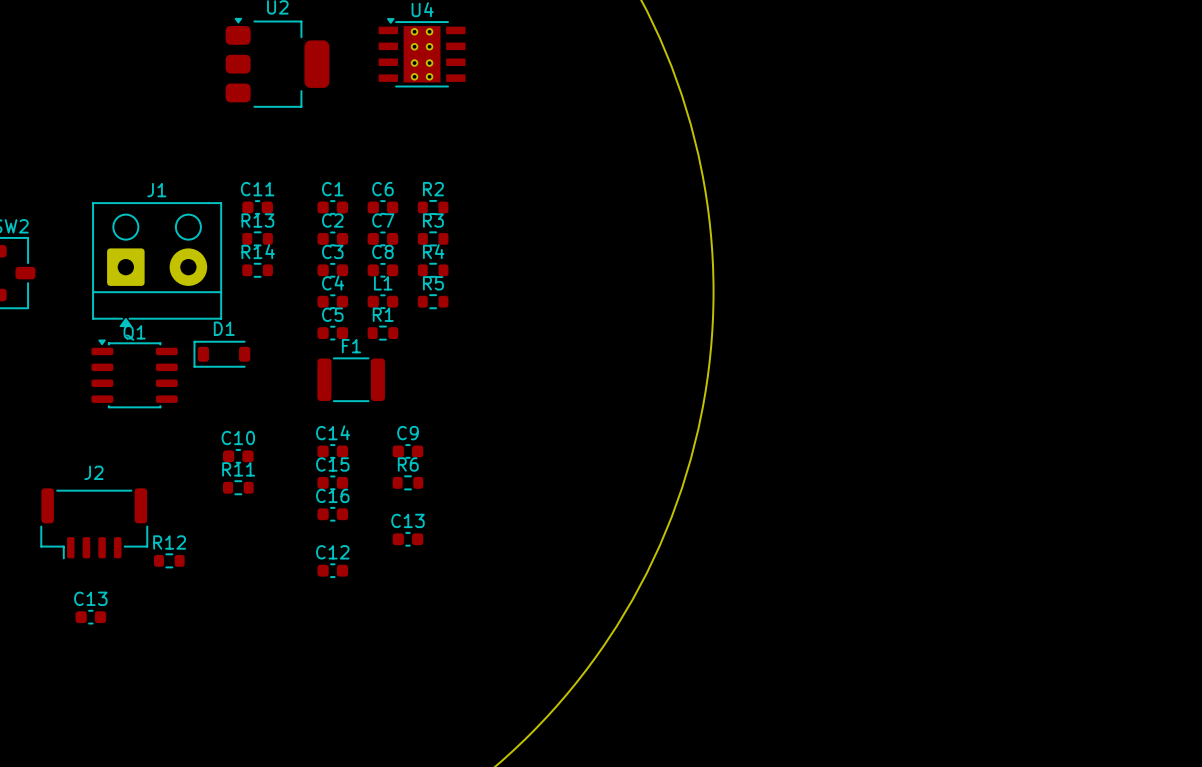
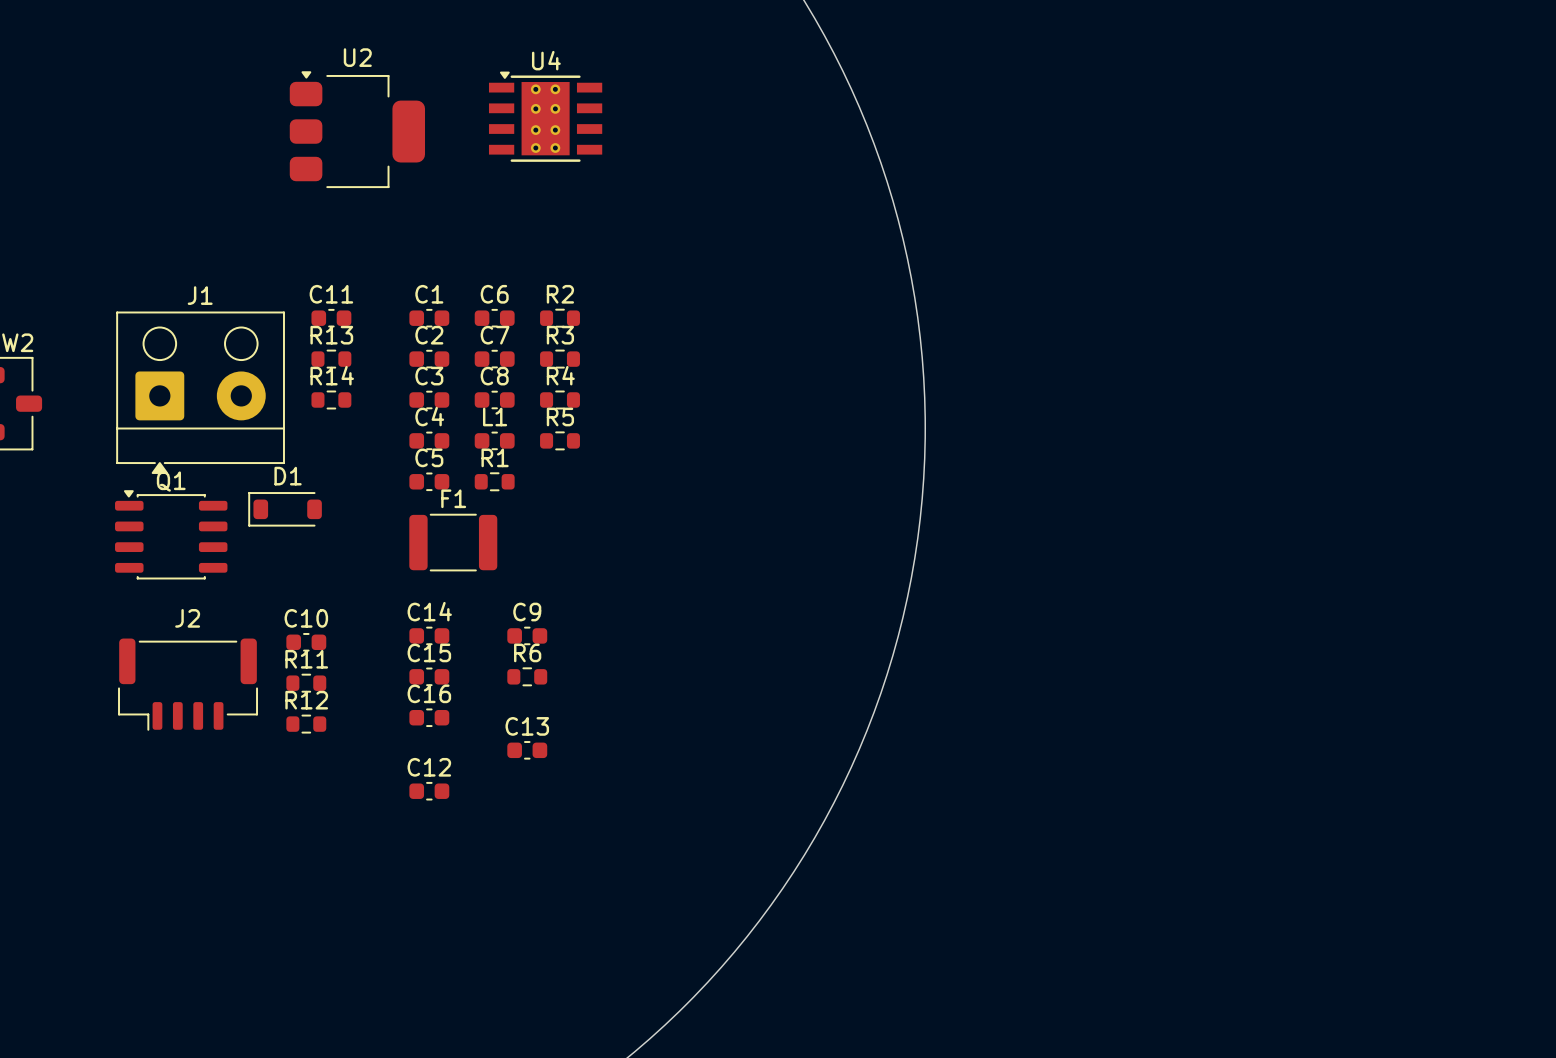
J2 position: (94, 523) -> (188, 684)
R12 position: (169, 560) -> (306, 724)
C13: (90, 617) -> none

